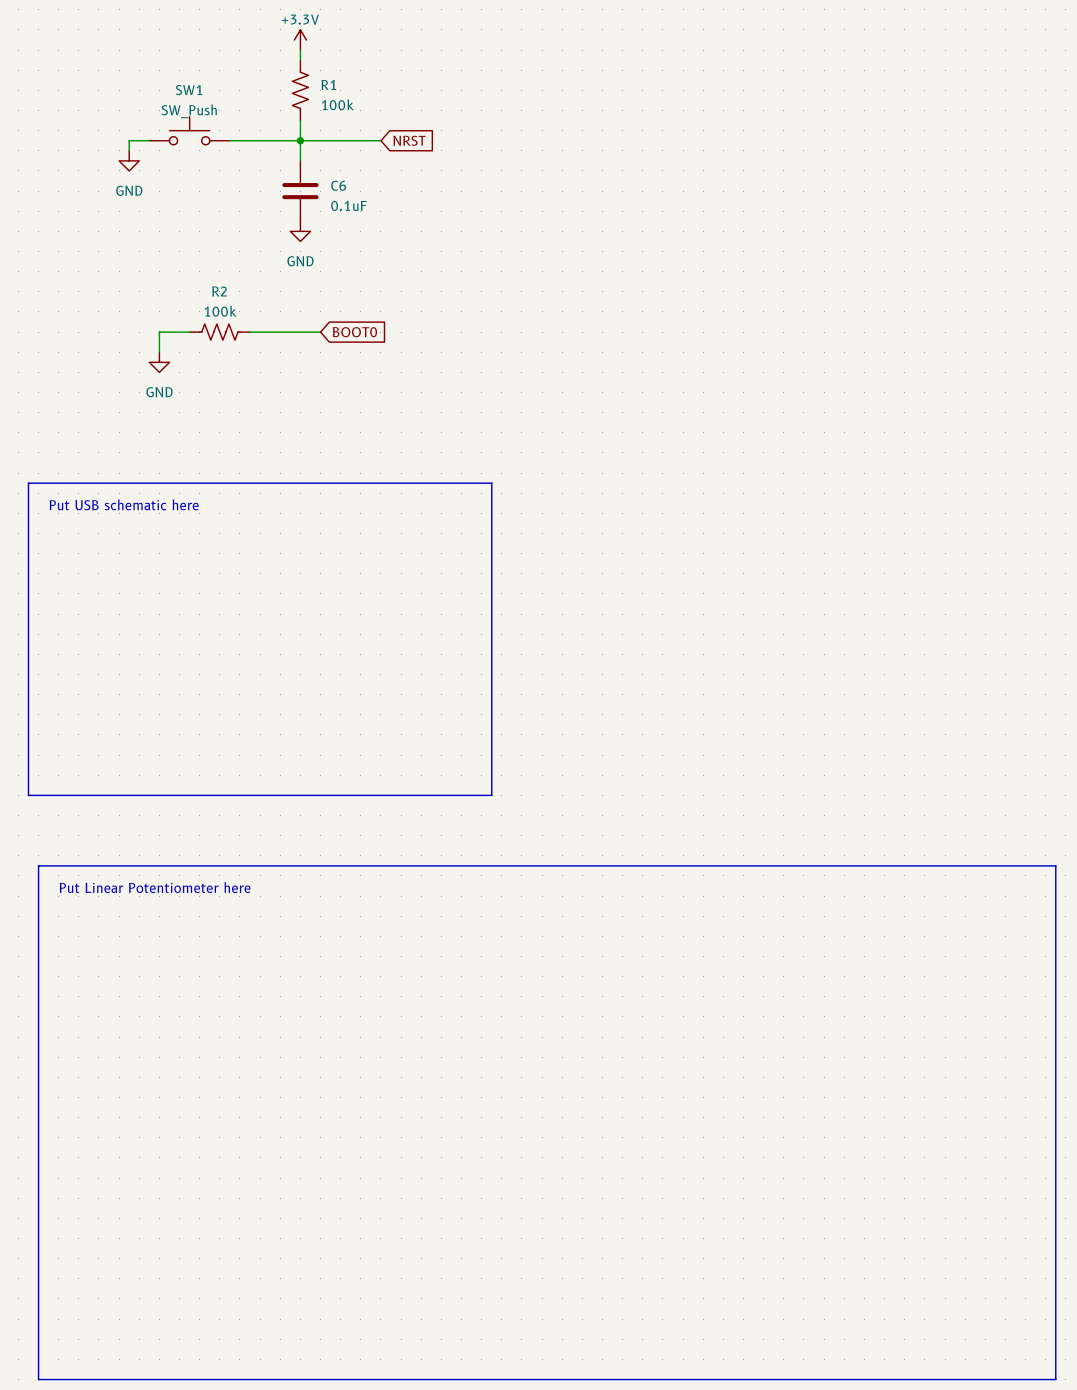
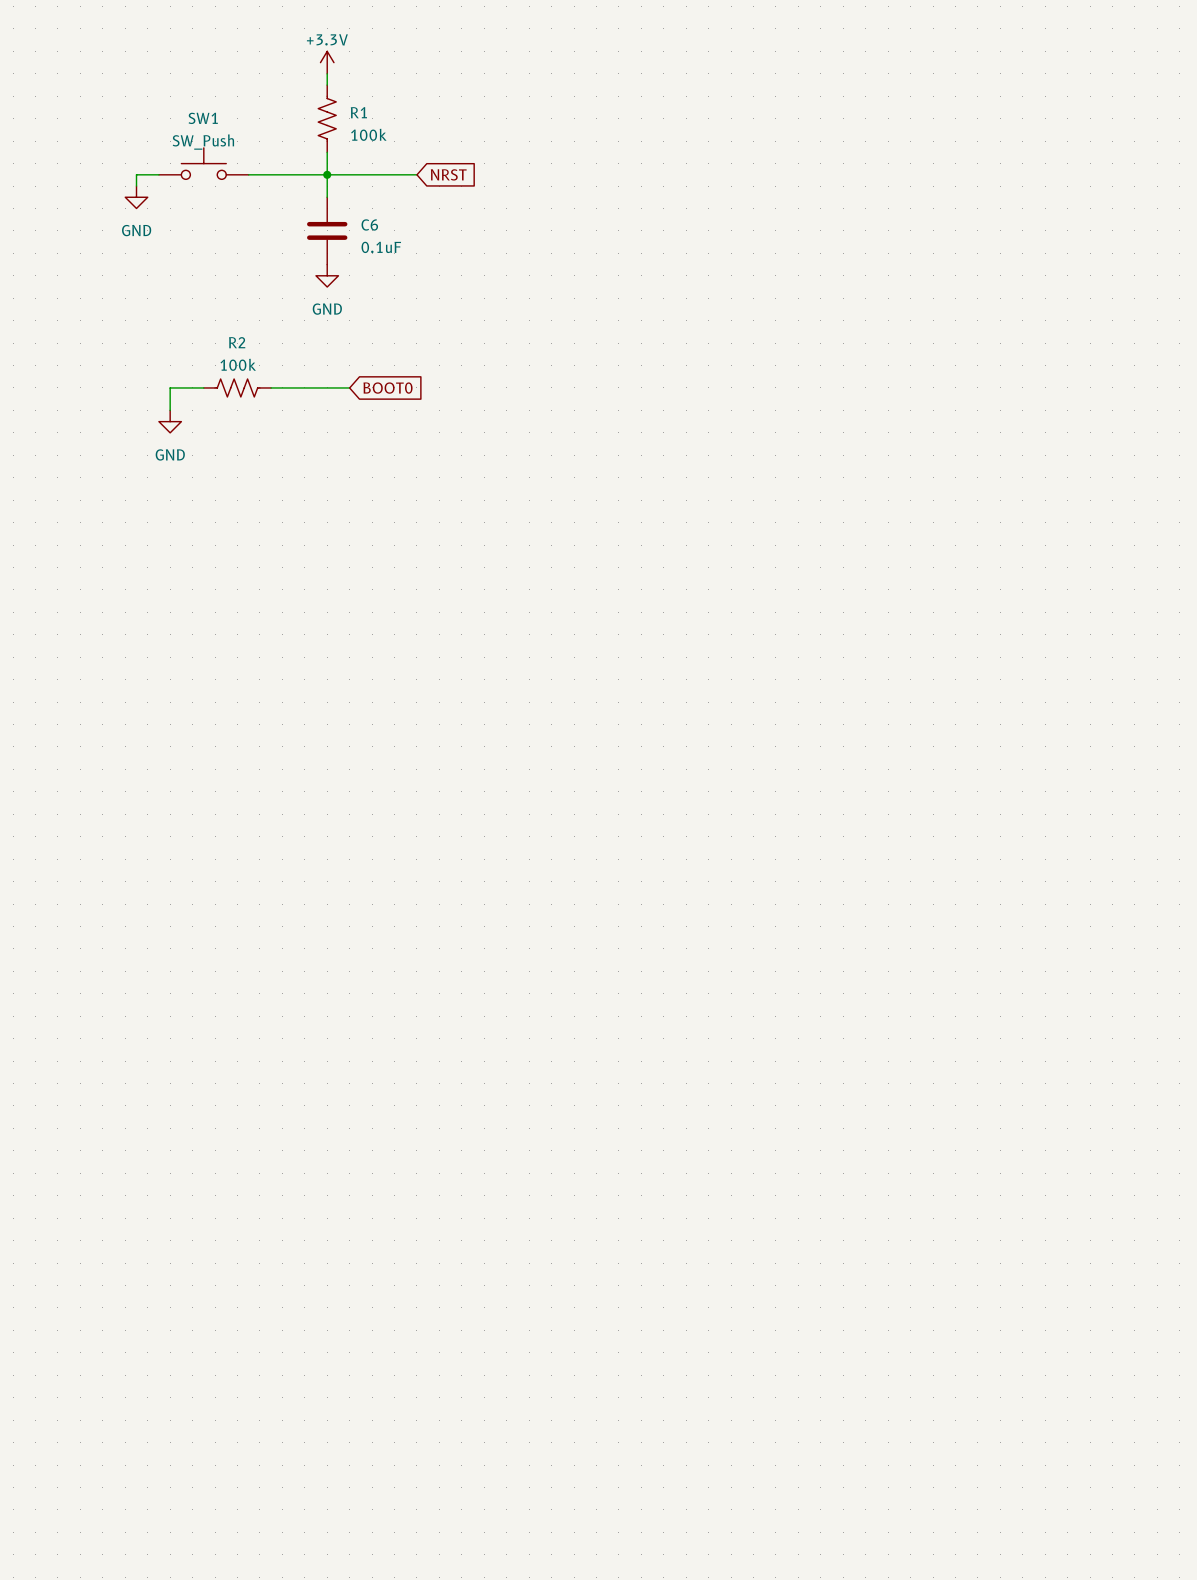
line: (28, 483) (491, 483) (491, 795) (28, 795) (28, 483) -> none
text: Put USB schematic here (124, 504) -> none
line: (38, 865) (1055, 865) (1055, 1379) (38, 1379) (38, 865) -> none
text: Put Linear Potentiometer here (155, 887) -> none

